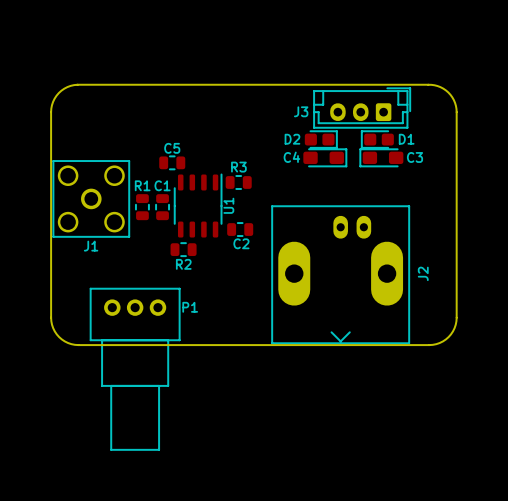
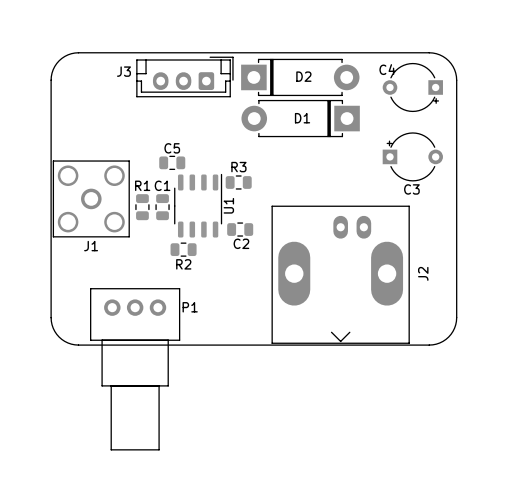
J3 position: (362, 108) -> (184, 76)
J3 name position: J3 (301, 111) -> J3 (123, 71)
board edge: (51, 112) (53, 101) (58, 93) (67, 87) (77, 84) (431, 84) (440, 87) (448, 92) (455, 102) (456, 112) -> (51, 112) (51, 80) (53, 69) (61, 58) (78, 52) (432, 53) (445, 58) (454, 69) (456, 80) (456, 112)
D2 footprint: [304, 130, 338, 149] -> [241, 58, 360, 96]
D1 footprint: [361, 130, 394, 149] -> [241, 100, 360, 138]
D2 name position: D2 (292, 139) -> D2 (303, 76)
D1 name position: D1 (406, 139) -> D1 (302, 118)
C4 footprint: [303, 148, 347, 167] -> [382, 63, 443, 112]
C3 footprint: [359, 148, 404, 167] -> [382, 132, 443, 182]
C4 name position: C4 (291, 157) -> C4 (387, 69)
C3 name position: C3 (415, 157) -> C3 (411, 189)

